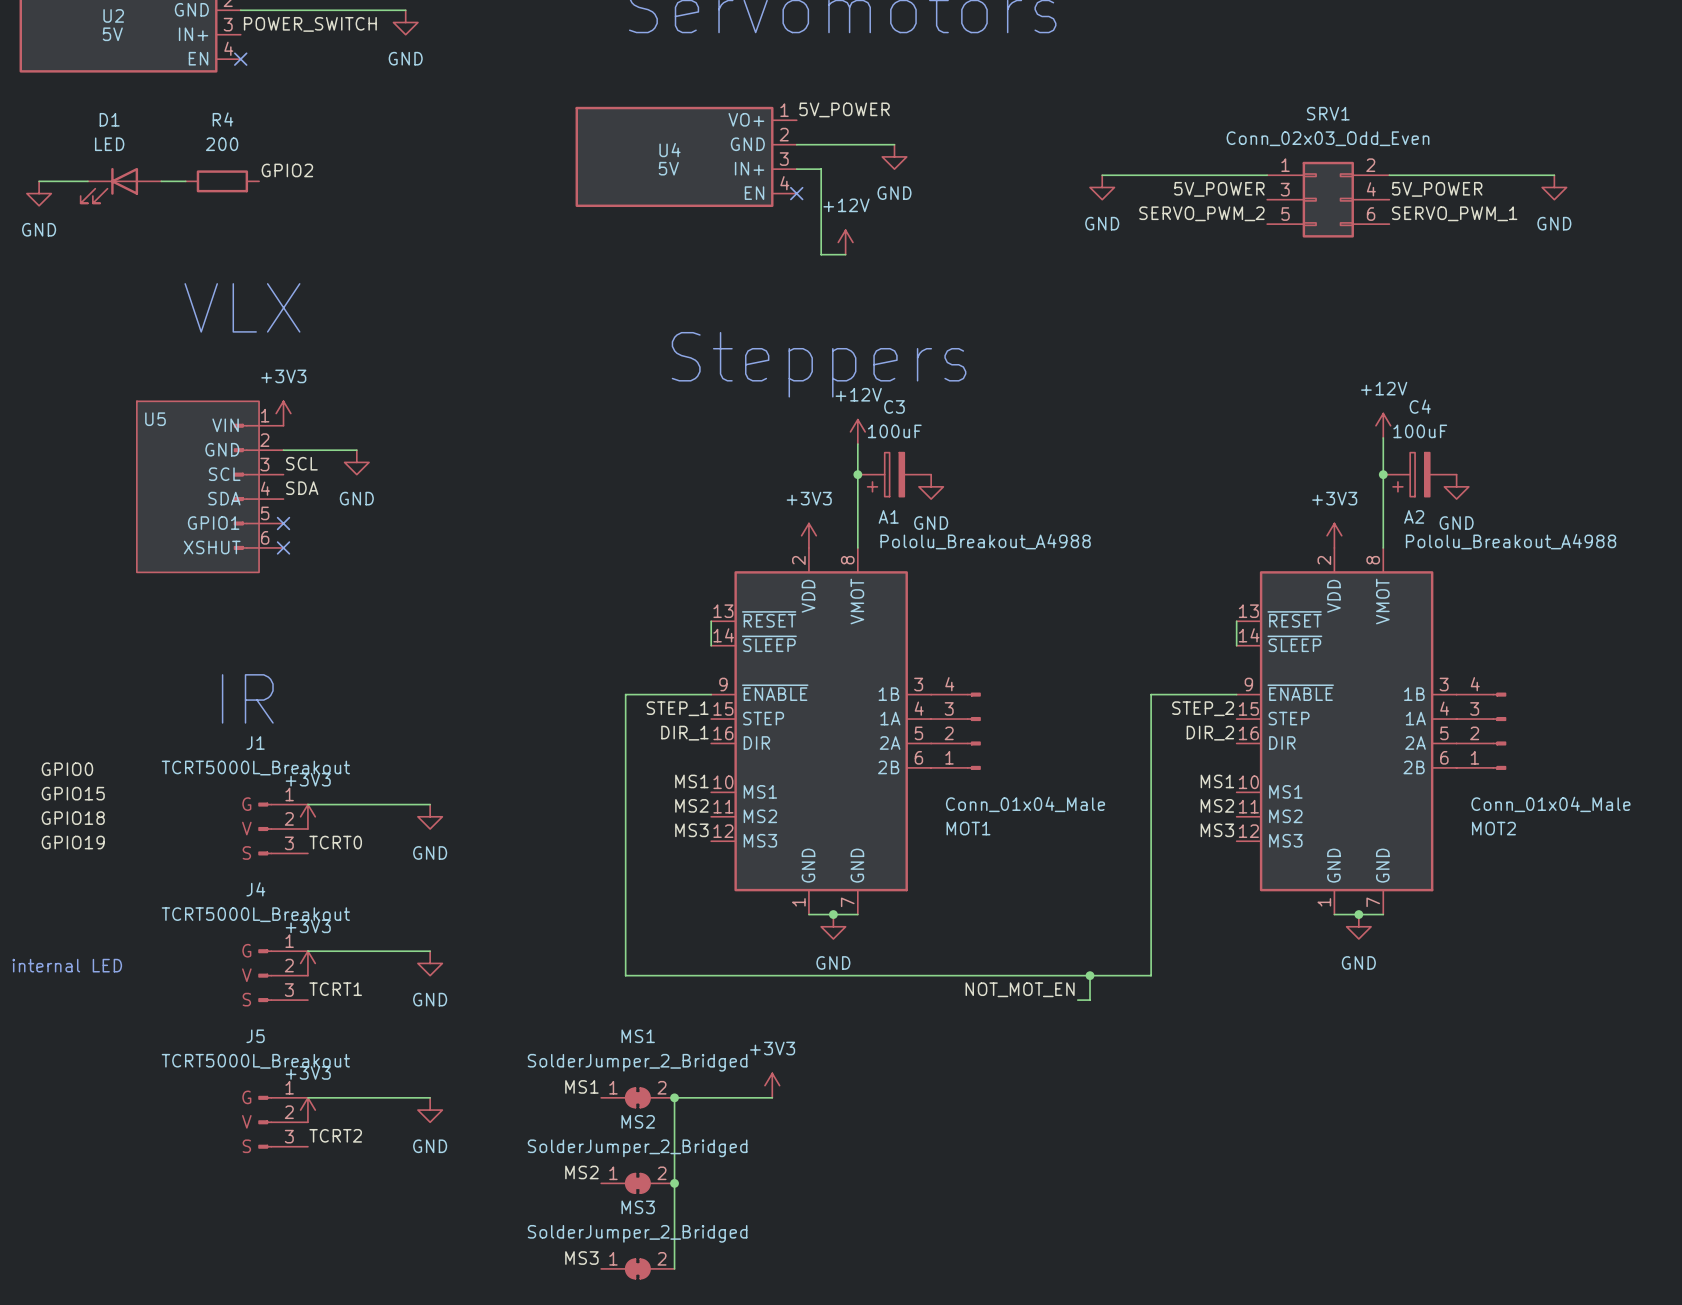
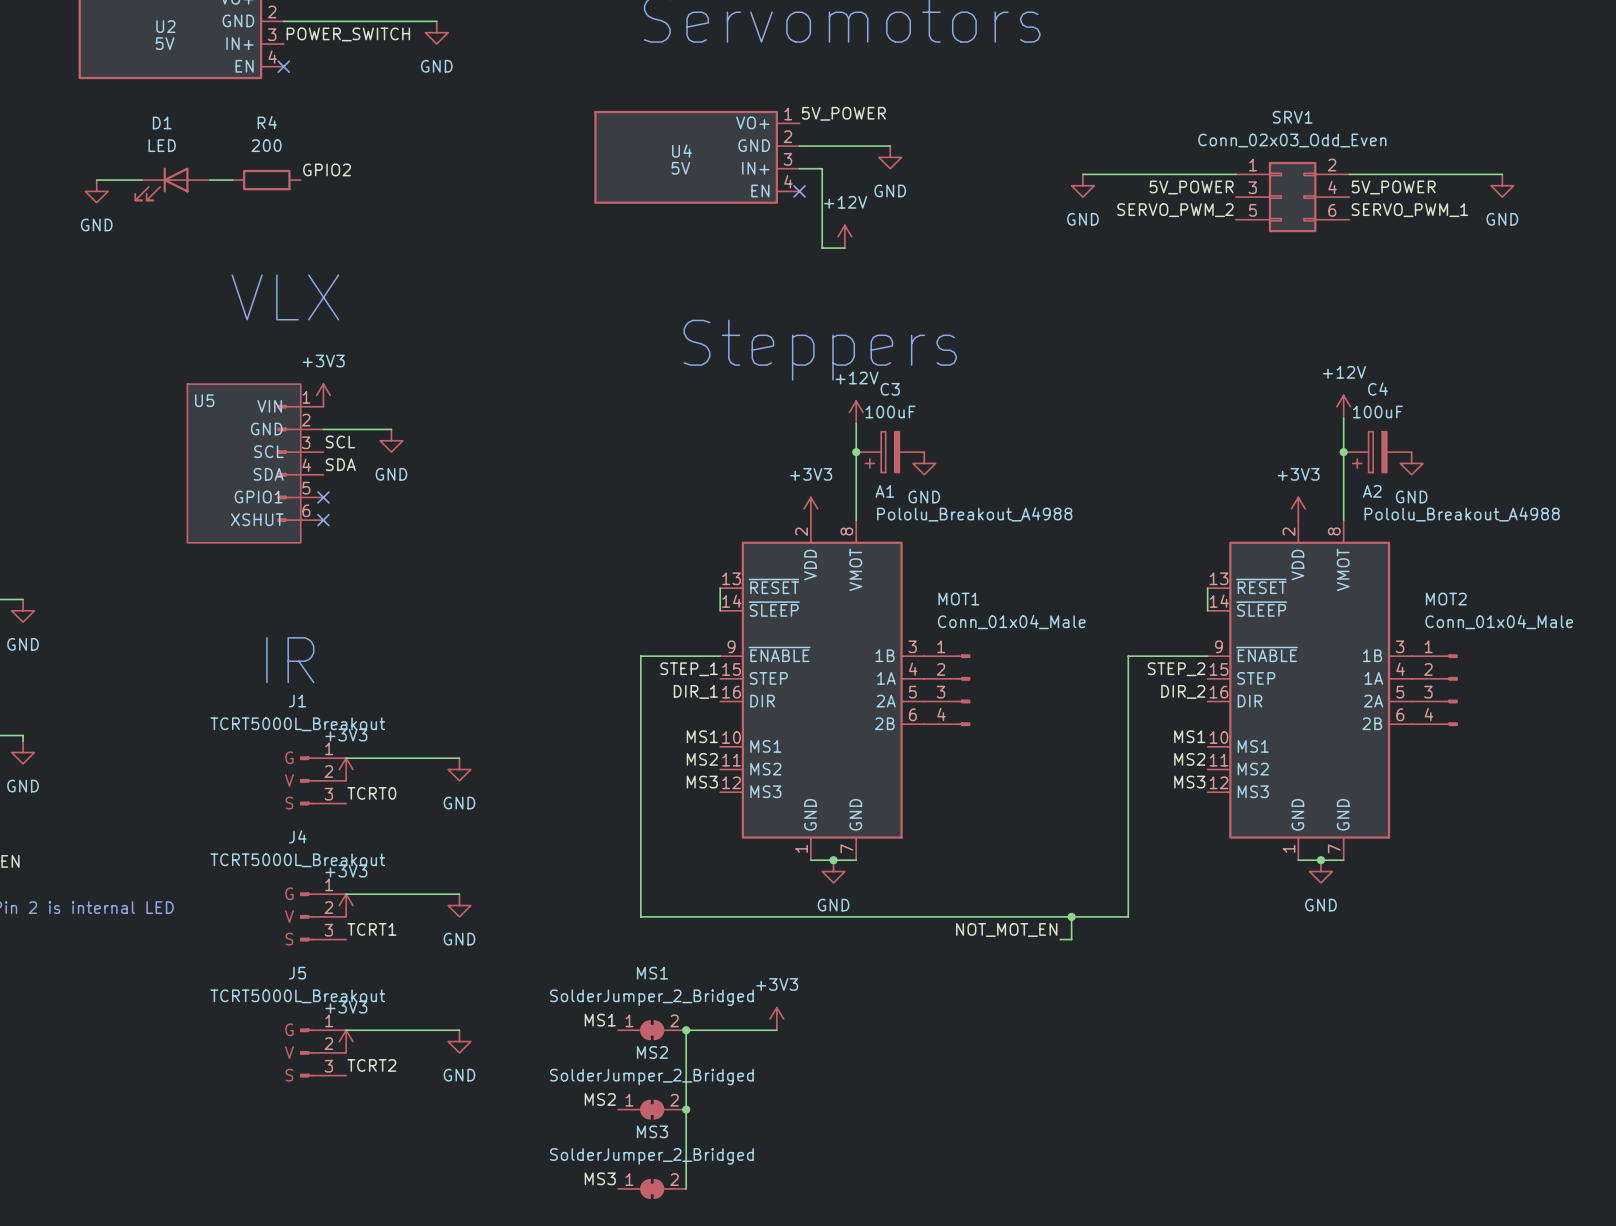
MOT1 flip: as is (973, 731) -> up-down (963, 690)
MOT2 flip: as is (1499, 731) -> up-down (1451, 690)
label: GPIO0 (67, 769) -> none
label: GPIO15 (73, 793) -> none
label: GPIO18 (73, 818) -> none
label: GPIO19 (73, 842) -> none

